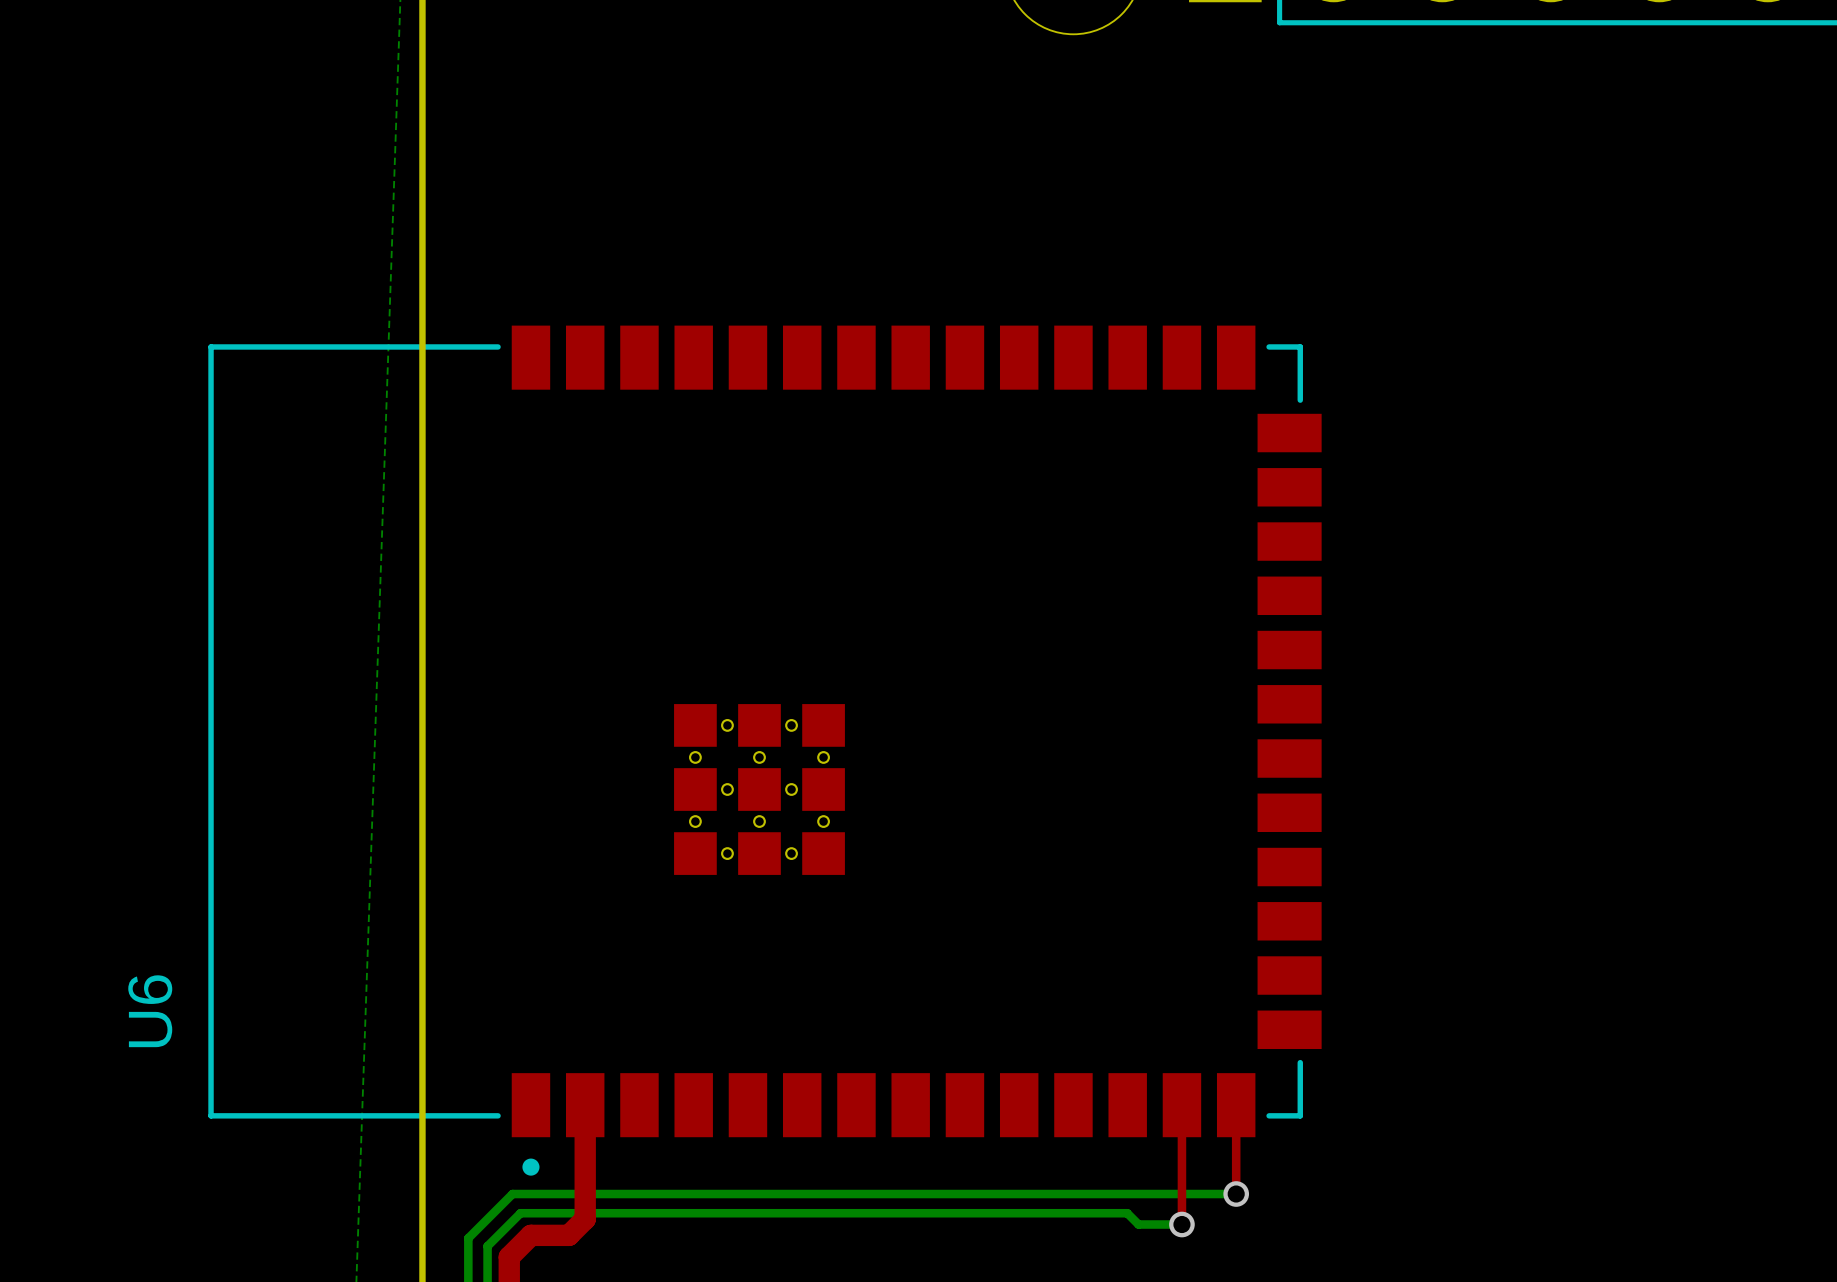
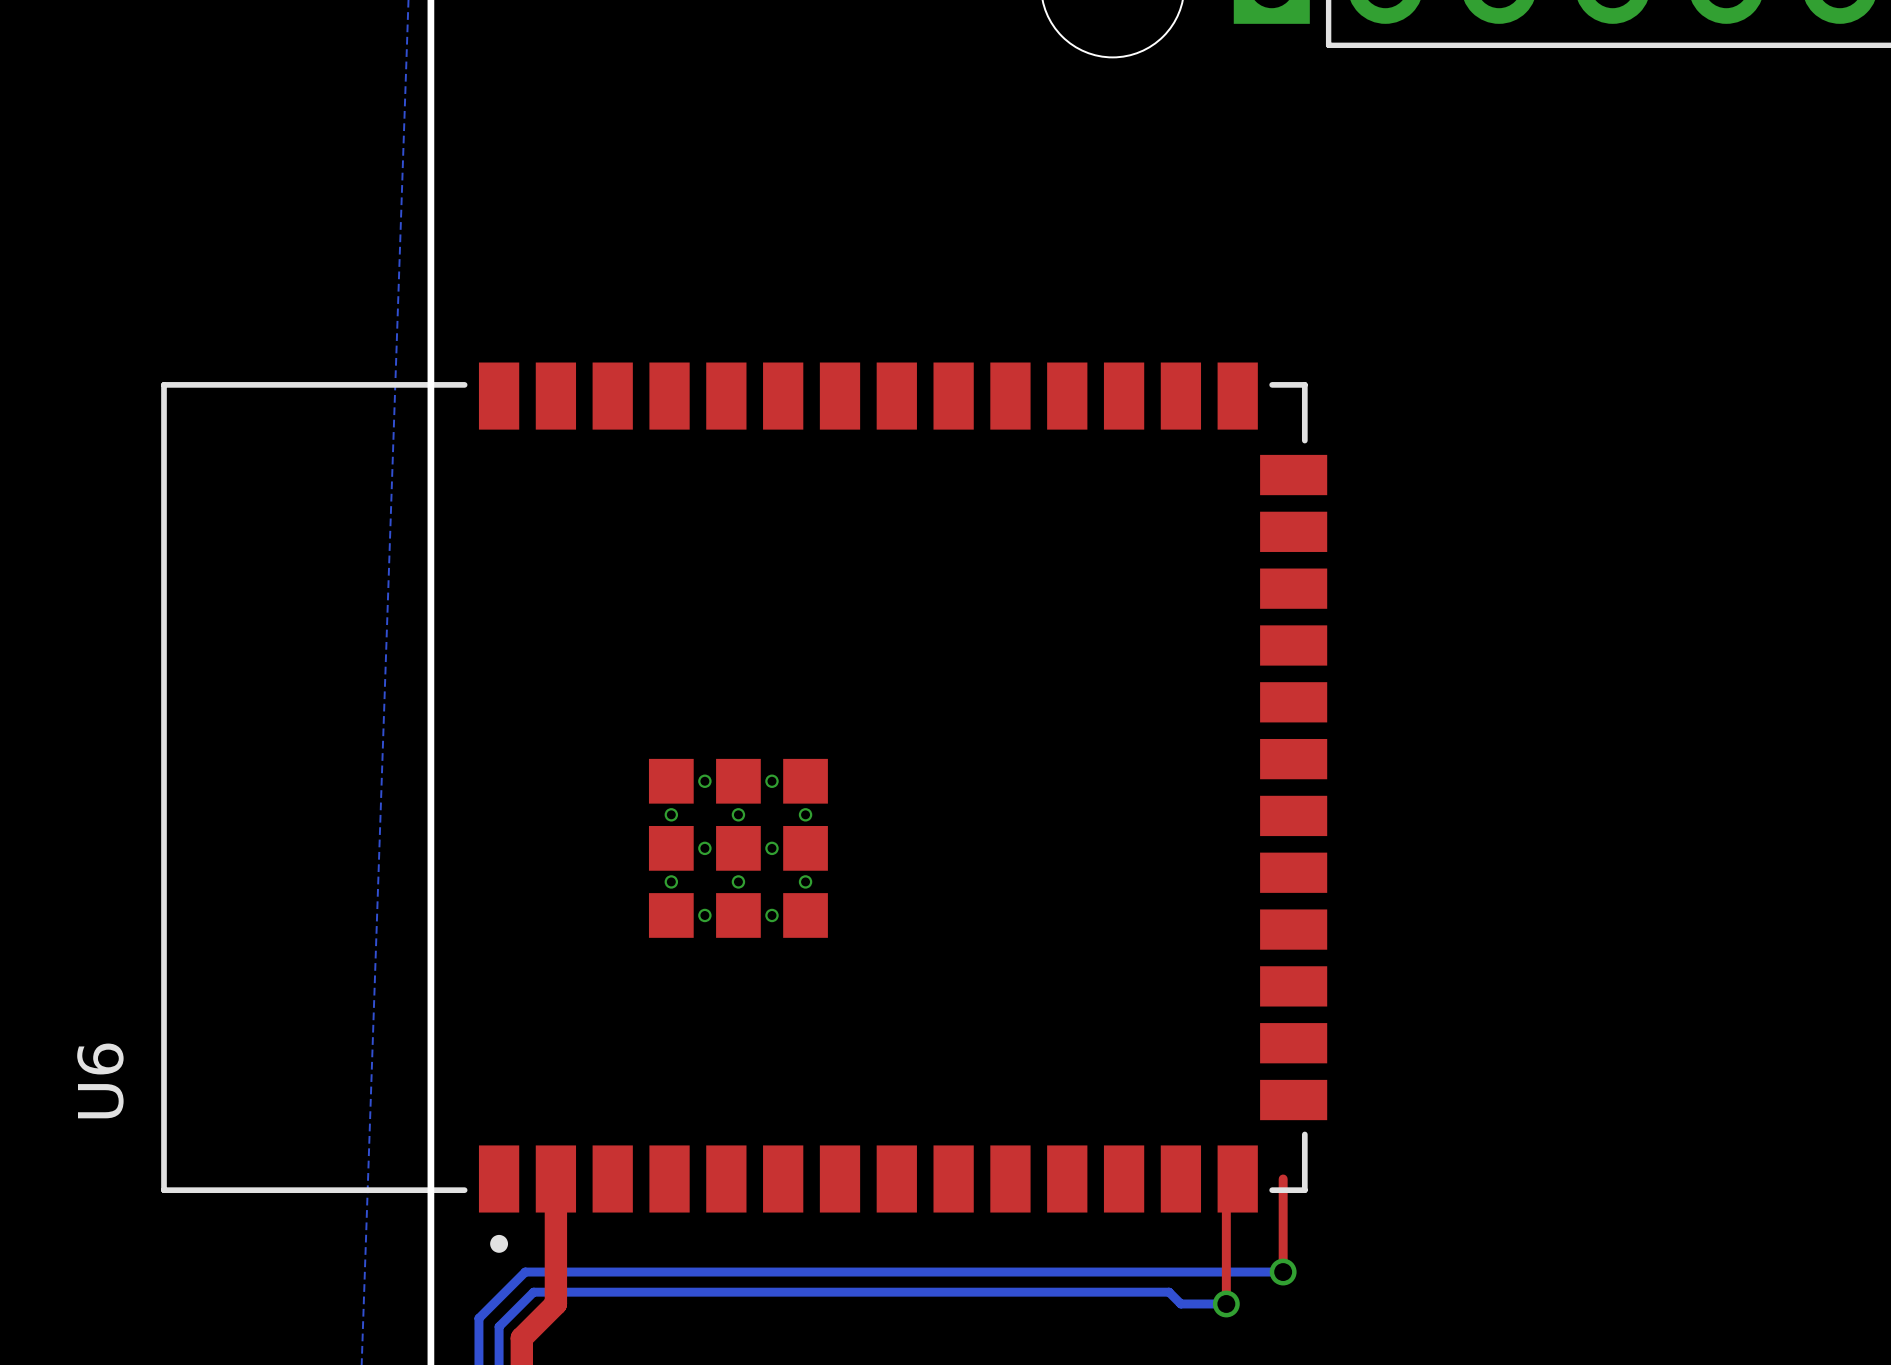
U6 position: (764, 750) -> (744, 807)
top track: (585, 1105) (585, 1219) (568, 1235) (530, 1235) -> (555, 1178) (555, 1303) (544, 1315)

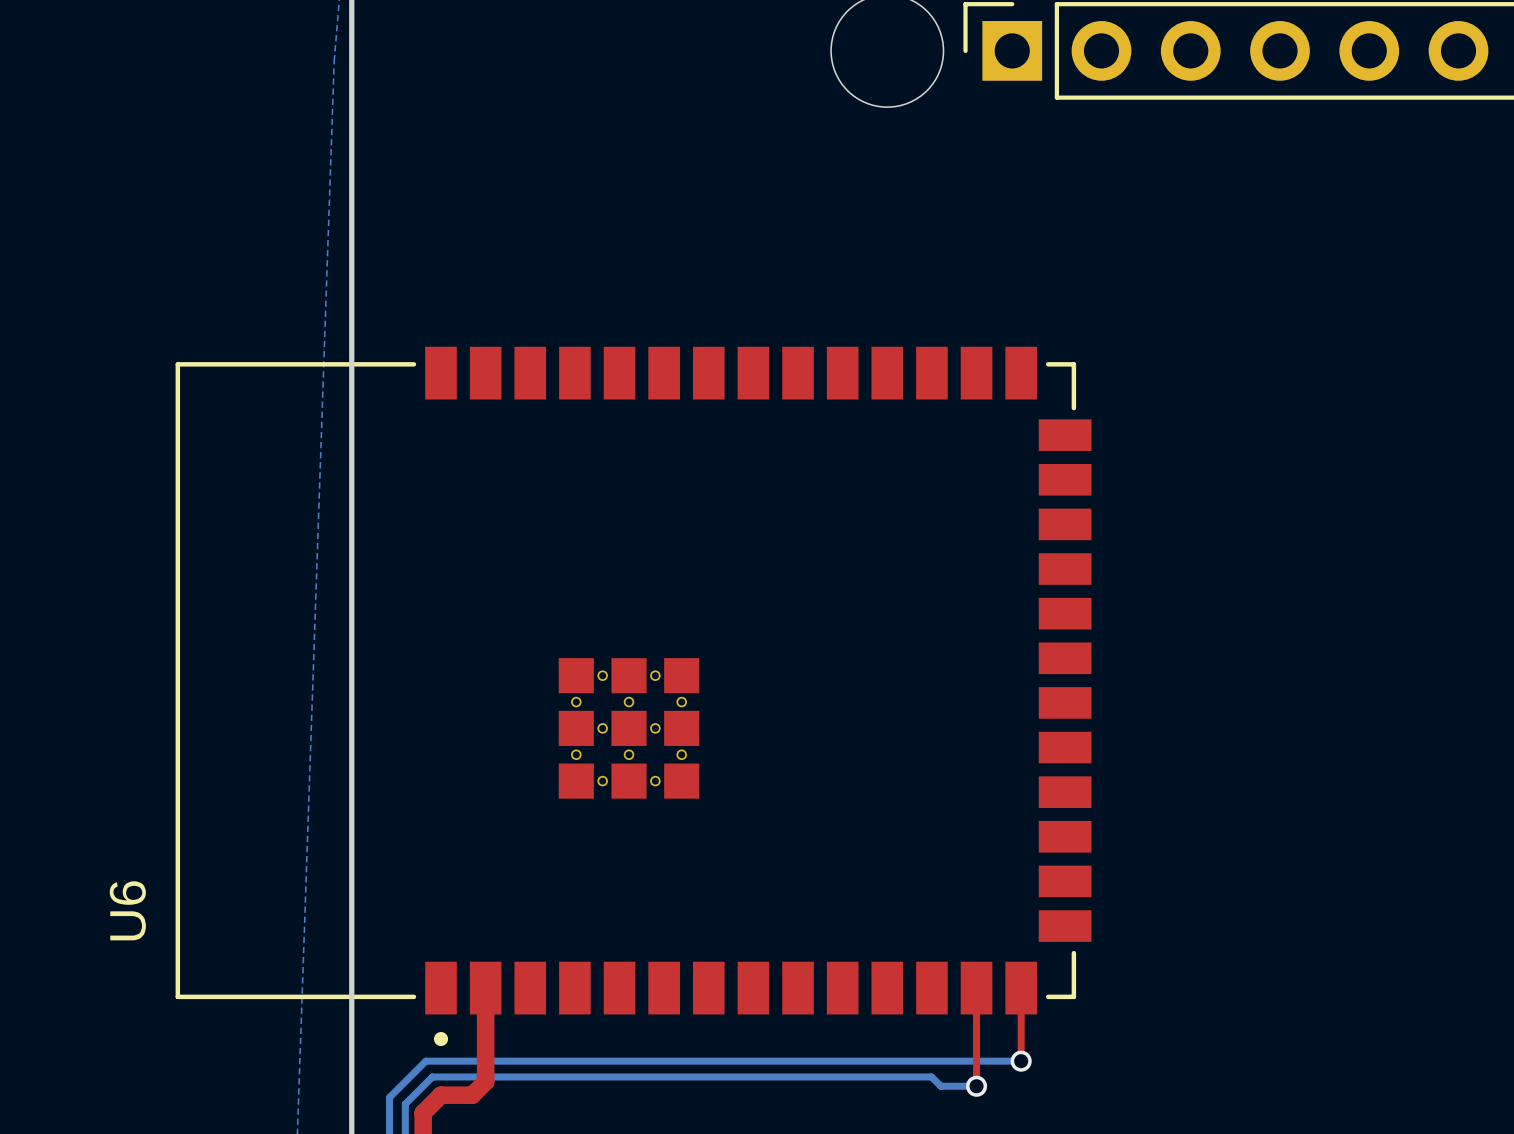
U6 position: (744, 807) -> (633, 696)
top track: (555, 1178) (555, 1303) (544, 1315) -> (485, 988) (485, 1081) (472, 1095) (441, 1095)

